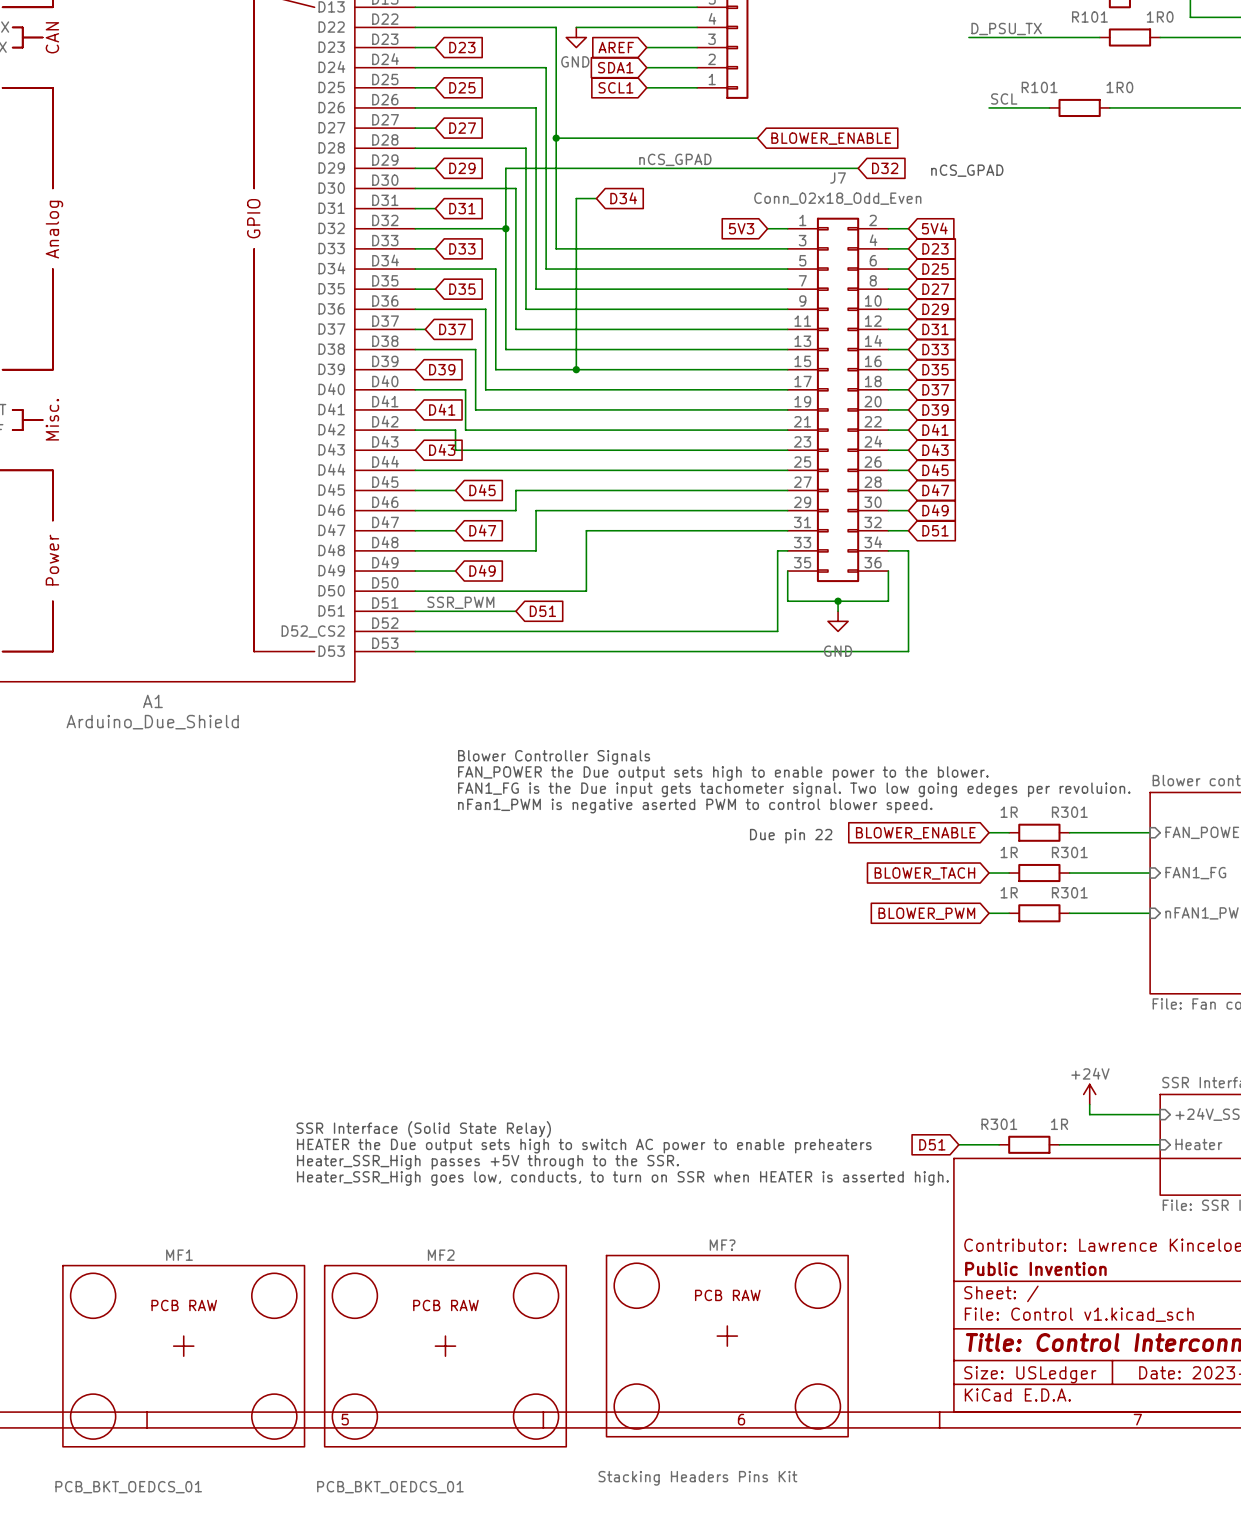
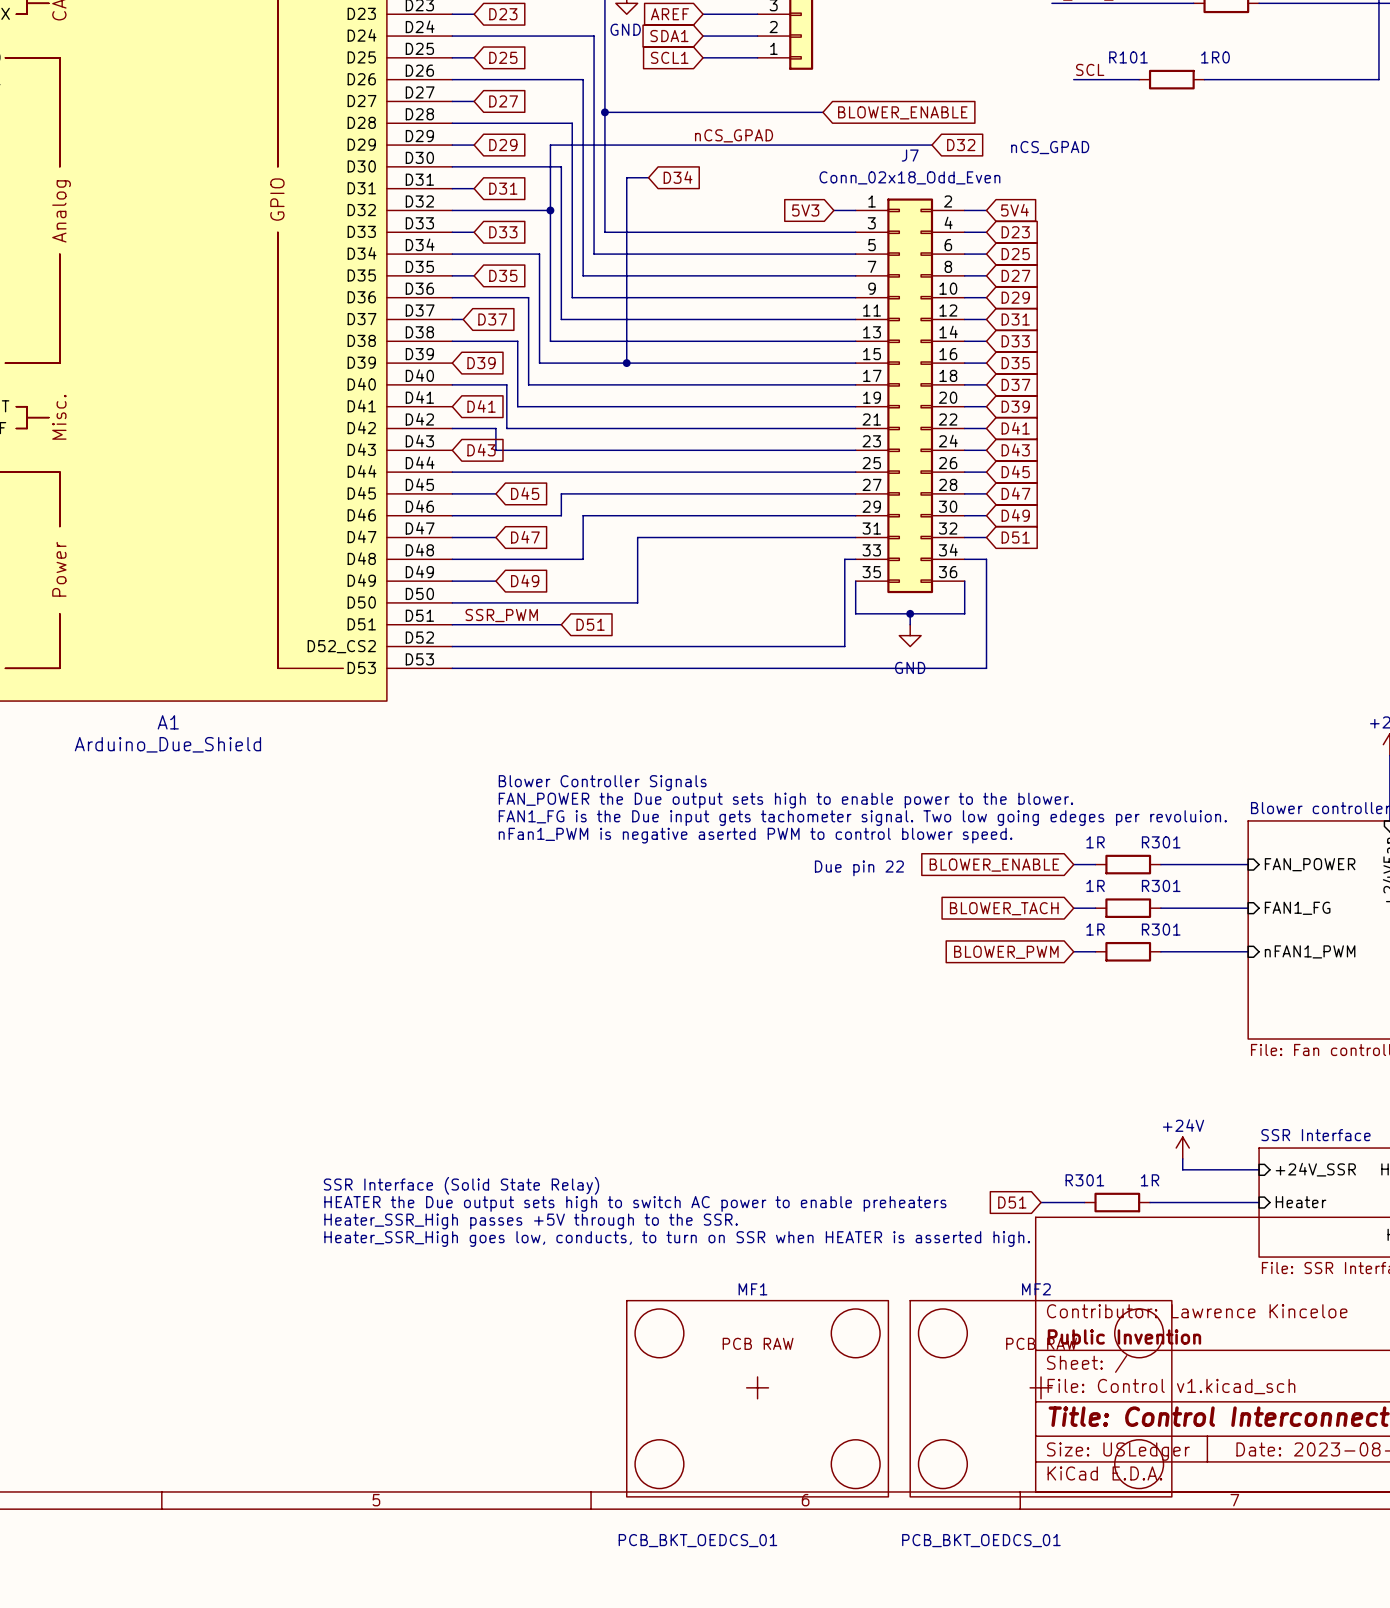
MF?: Stacking Headers Pins Kit (727, 1346) -> none
MF1 position: (183, 1356) -> (757, 1398)
MF2 position: (445, 1356) -> (1041, 1398)

